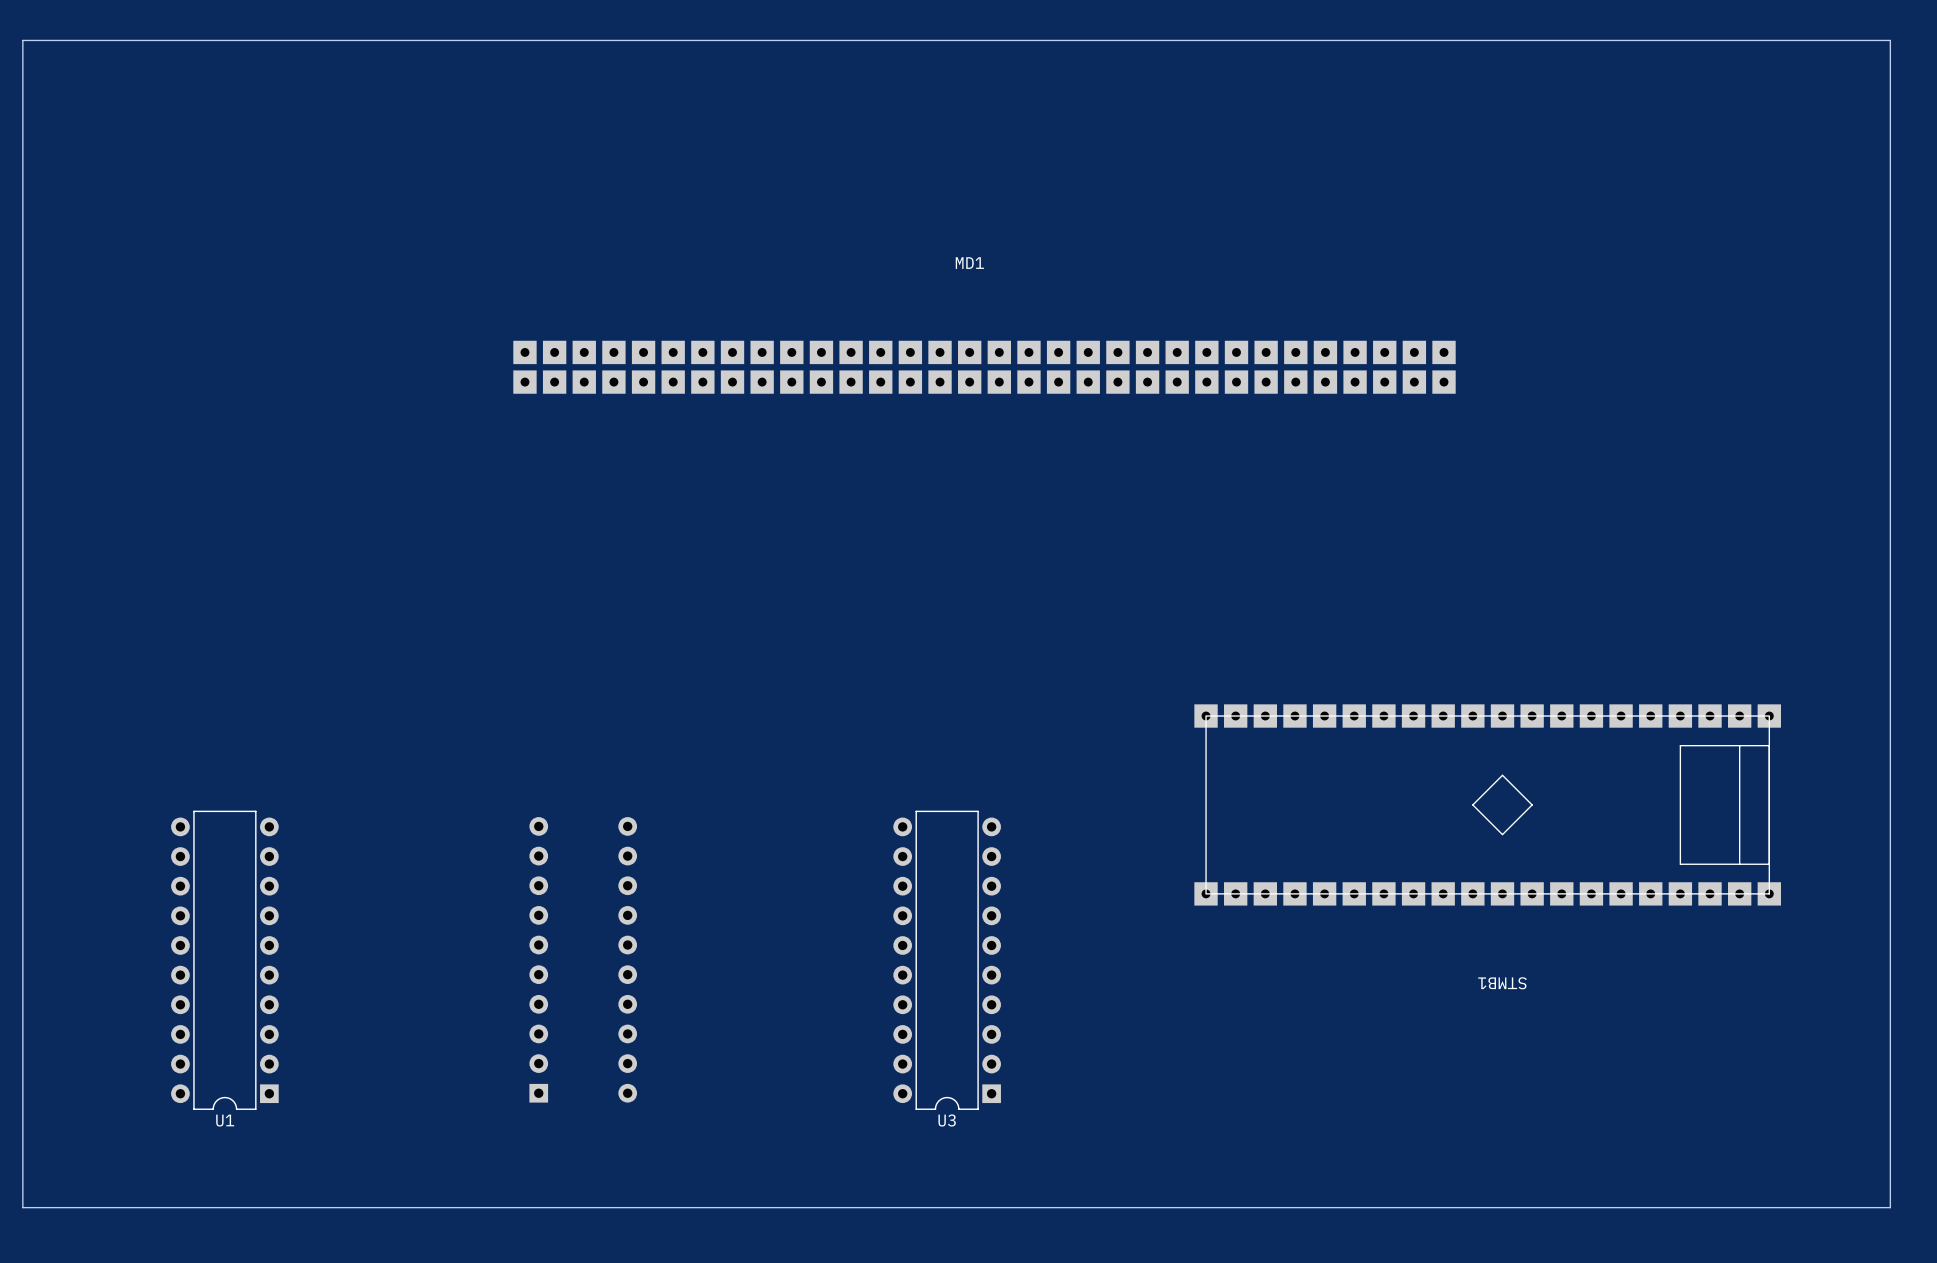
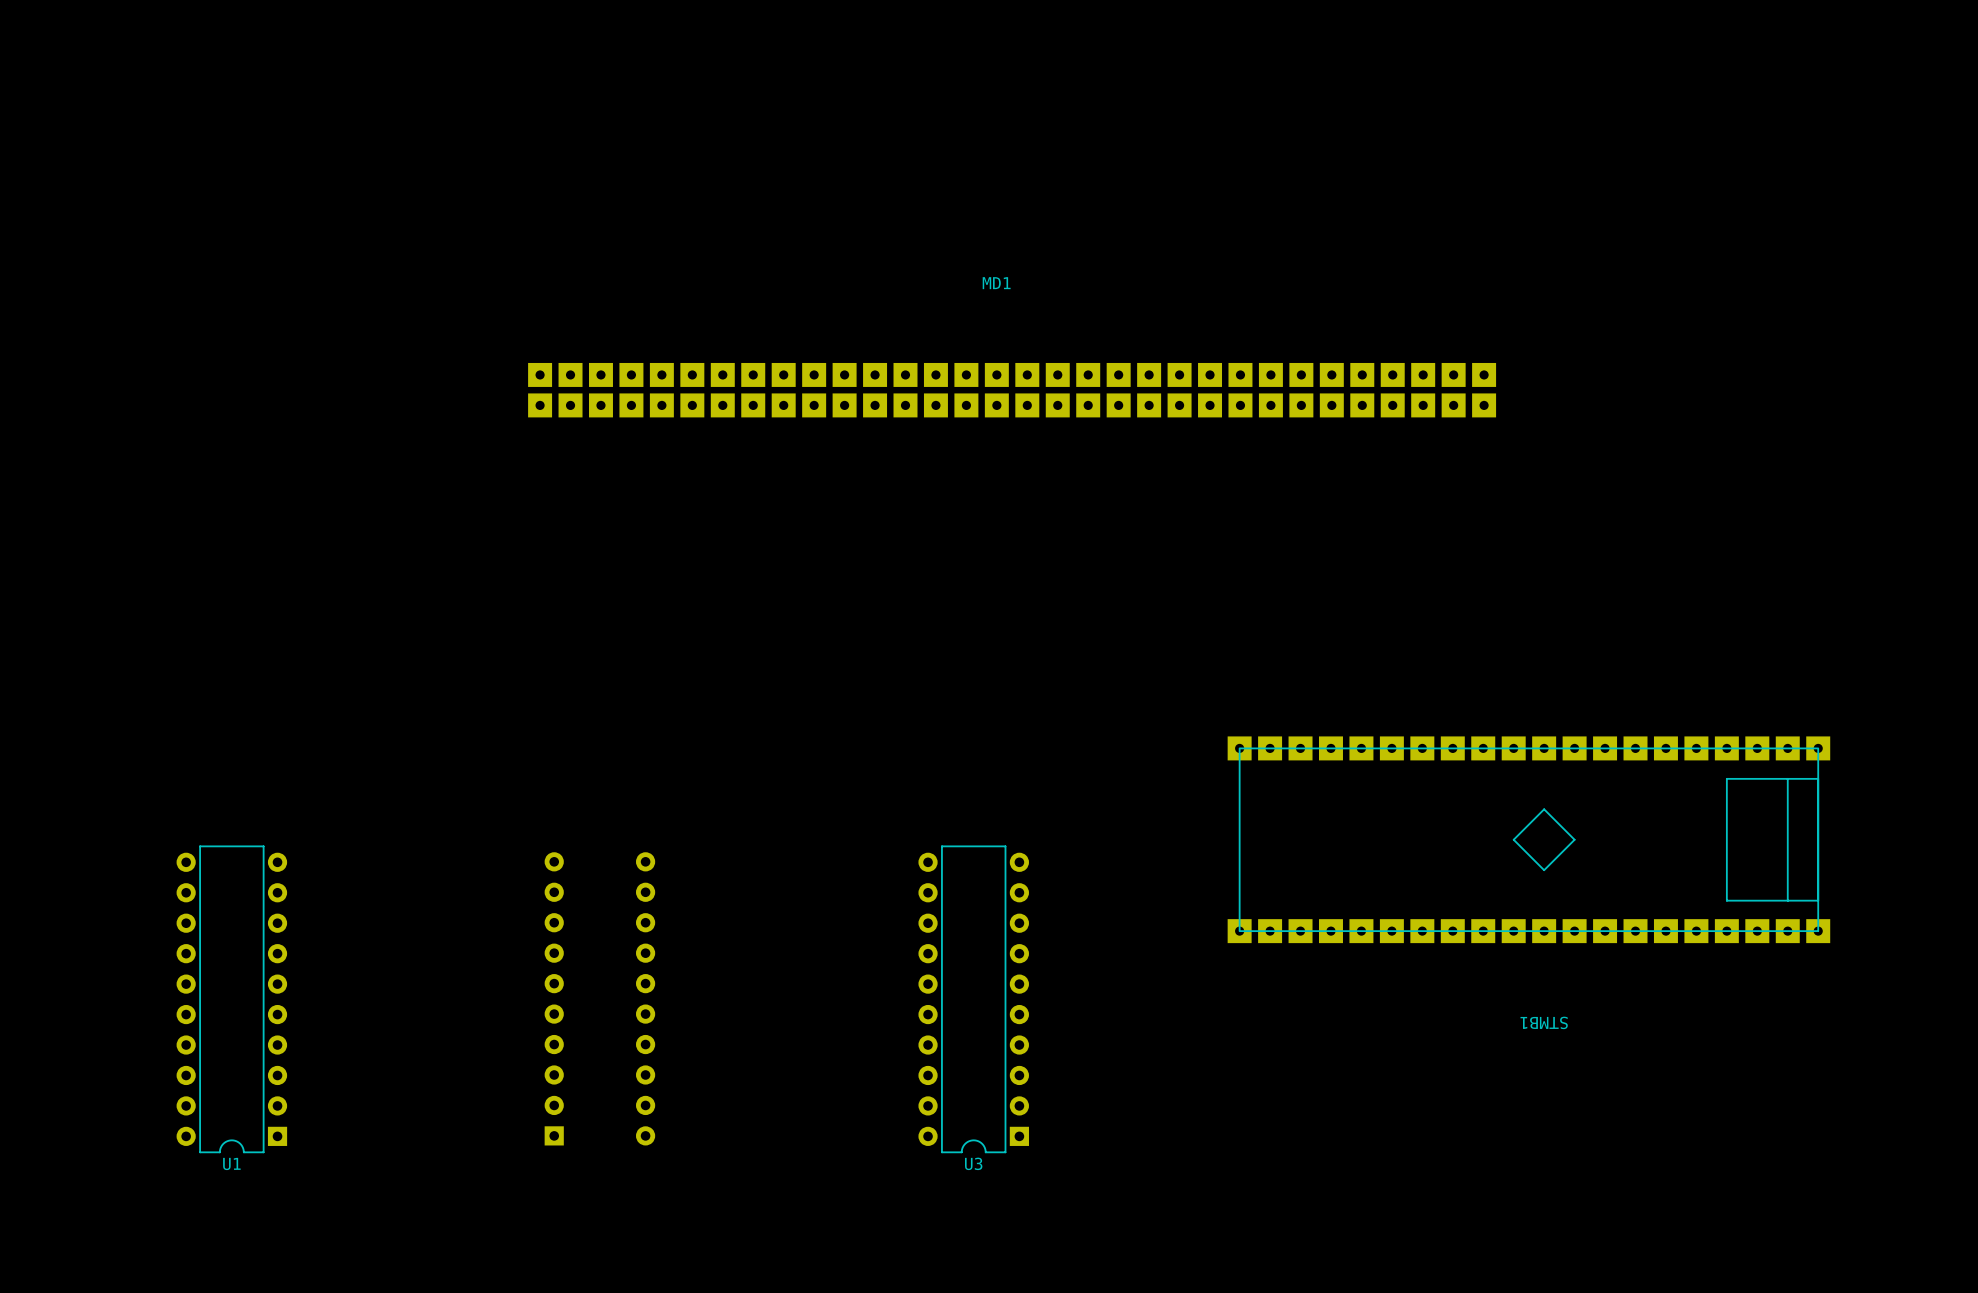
board edge: (22, 40) (1890, 40) (1890, 1207) (22, 1207) (22, 40) -> none

